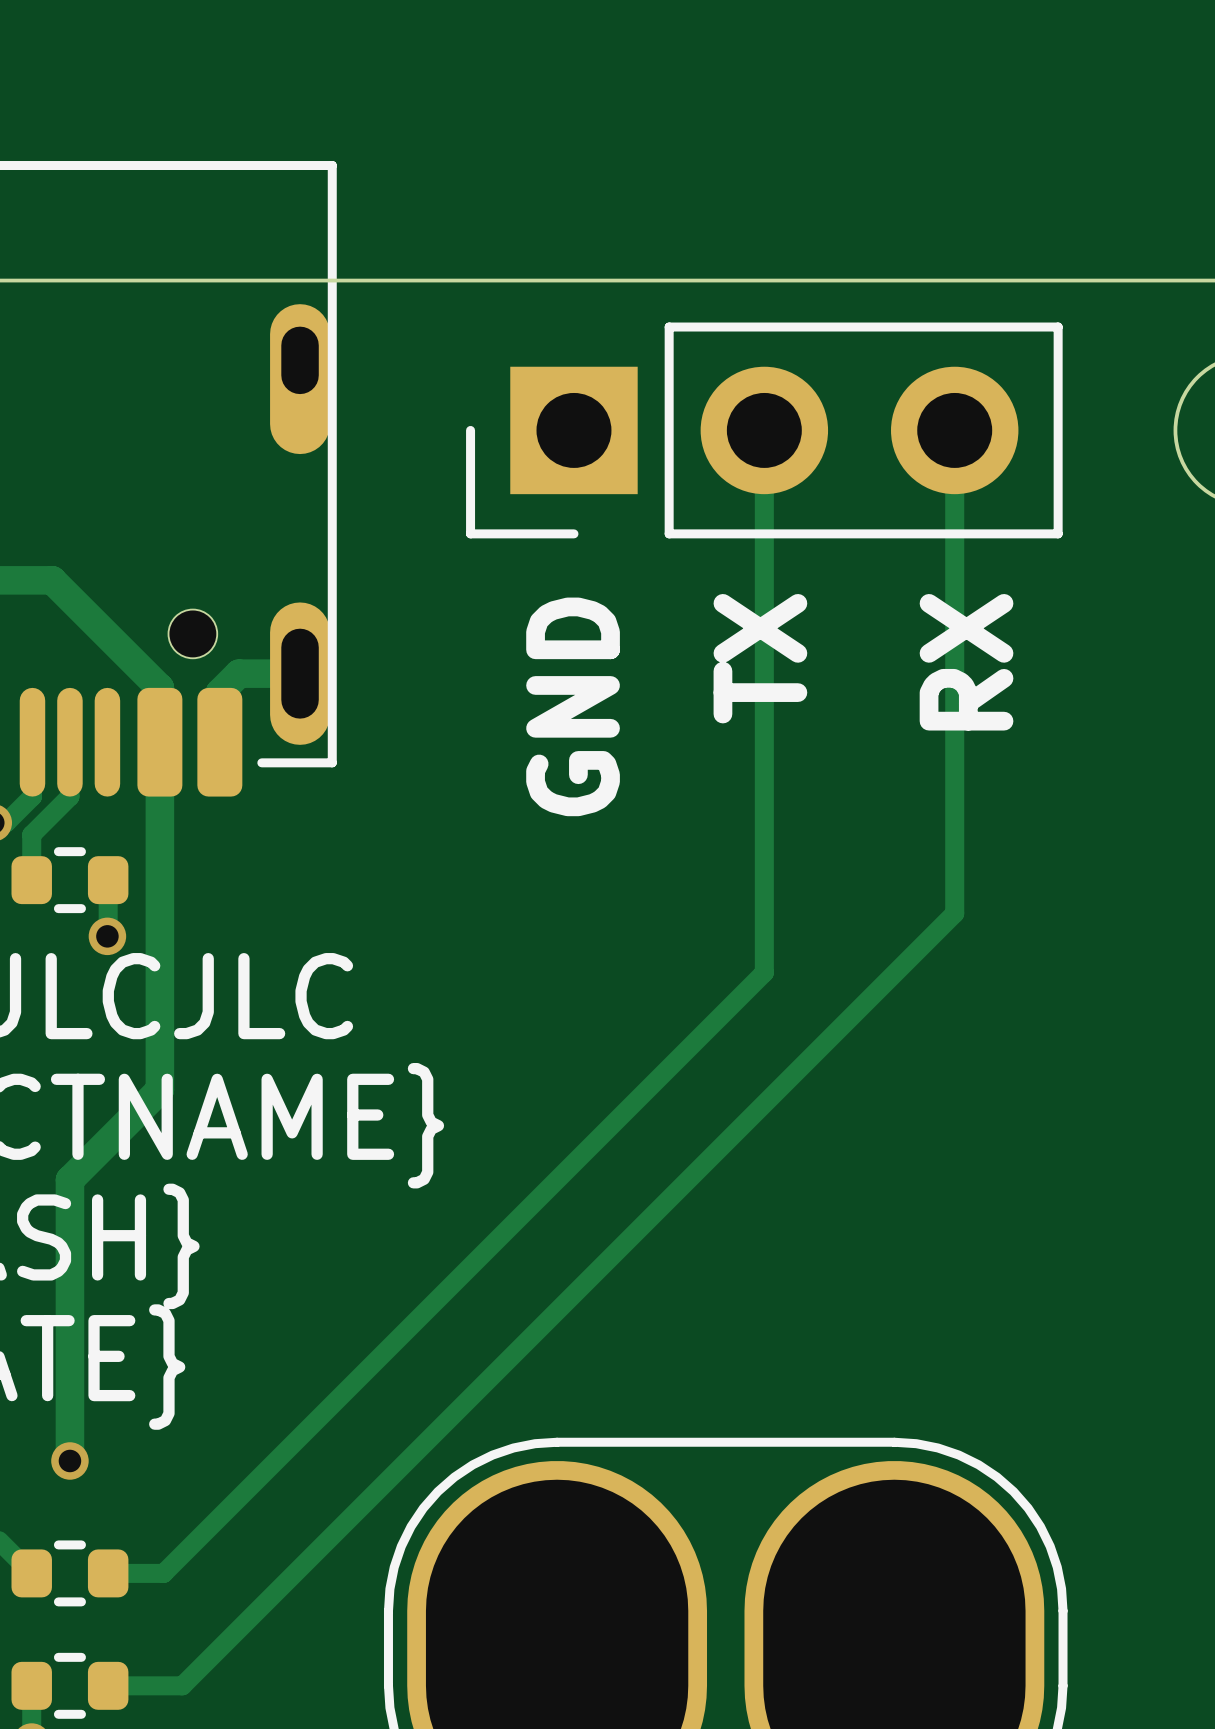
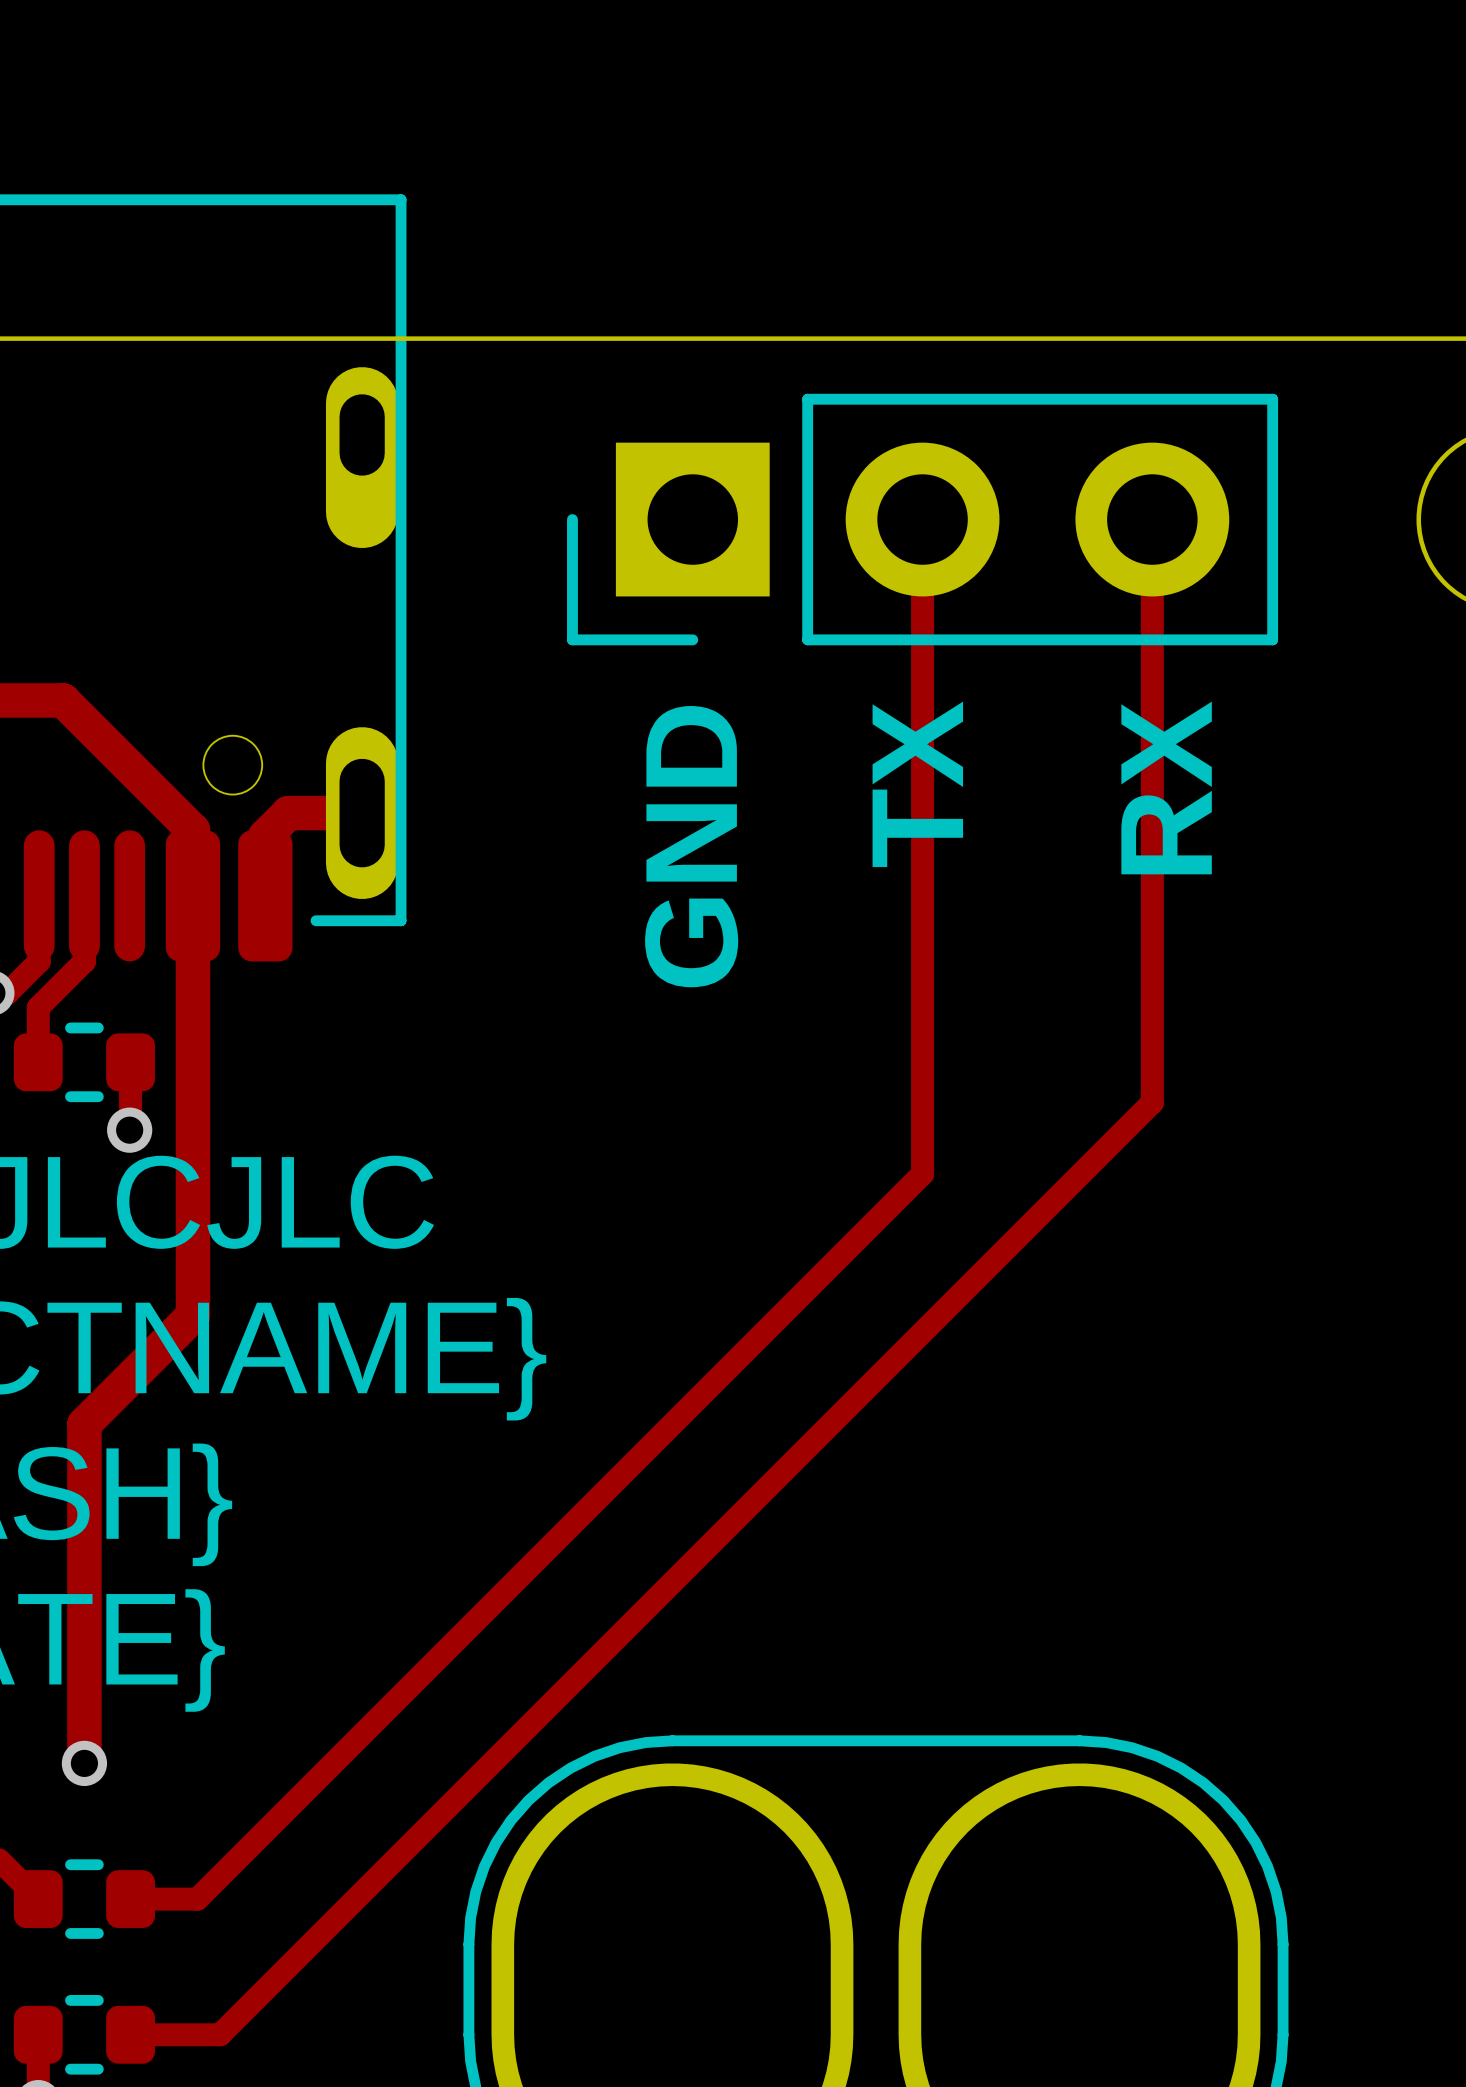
part footprint: [466, 322, 1063, 539] -> [567, 393, 1279, 646]

